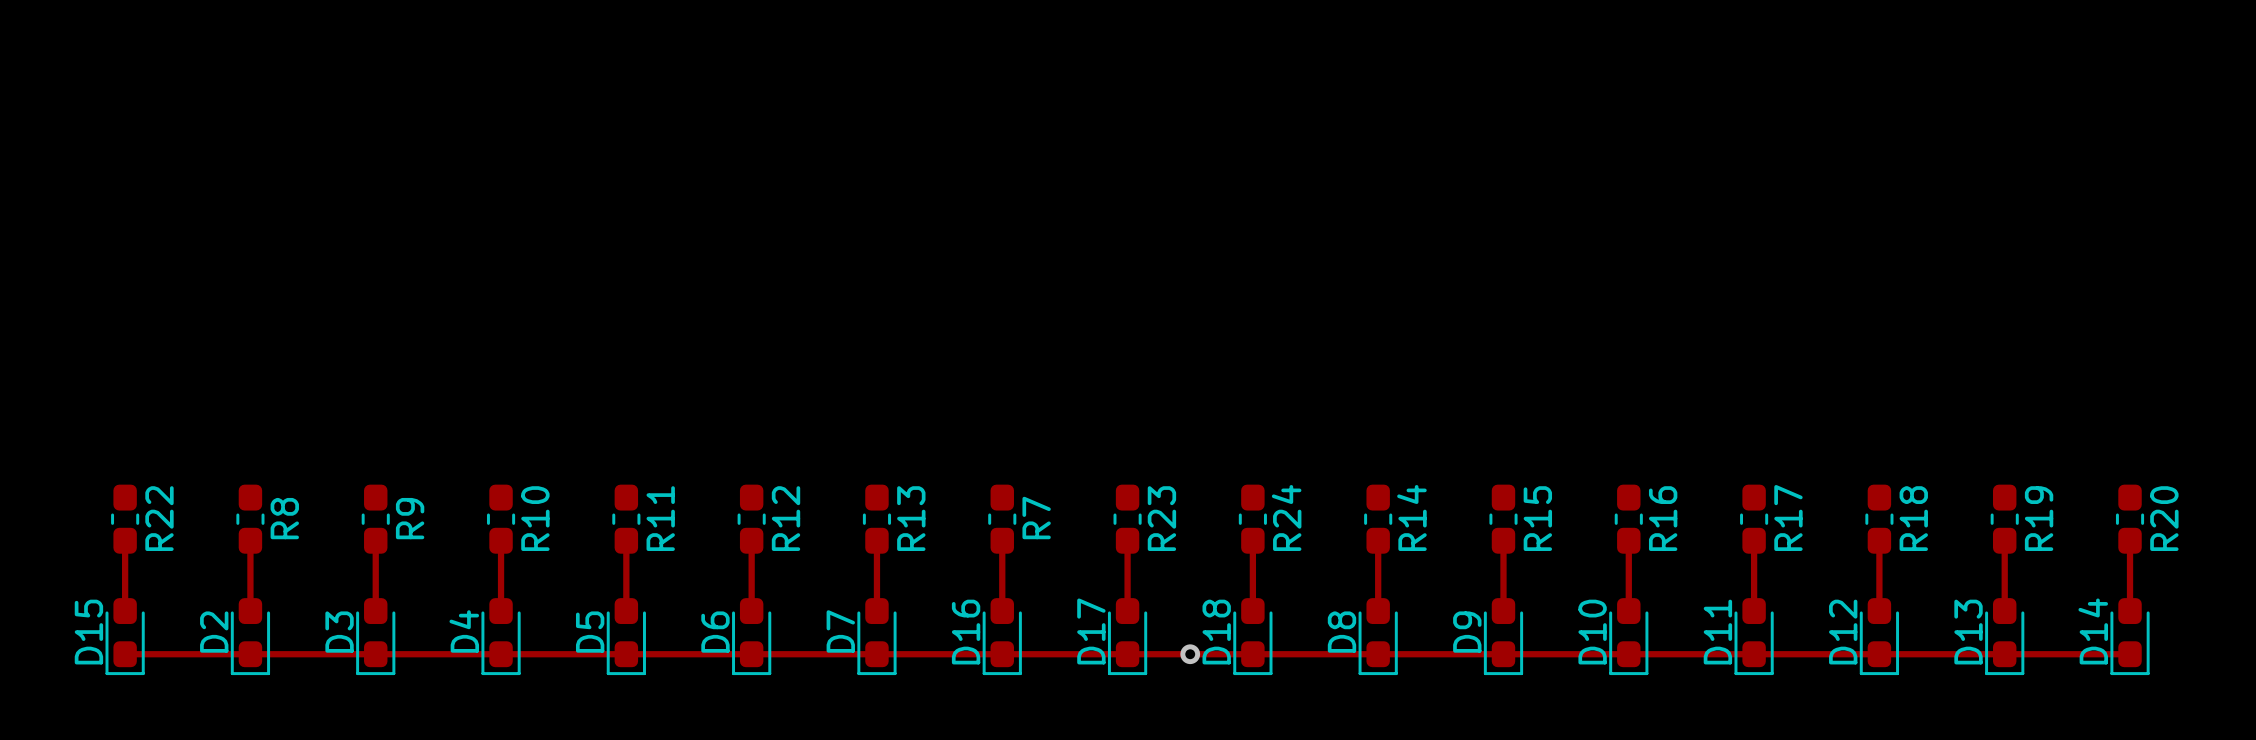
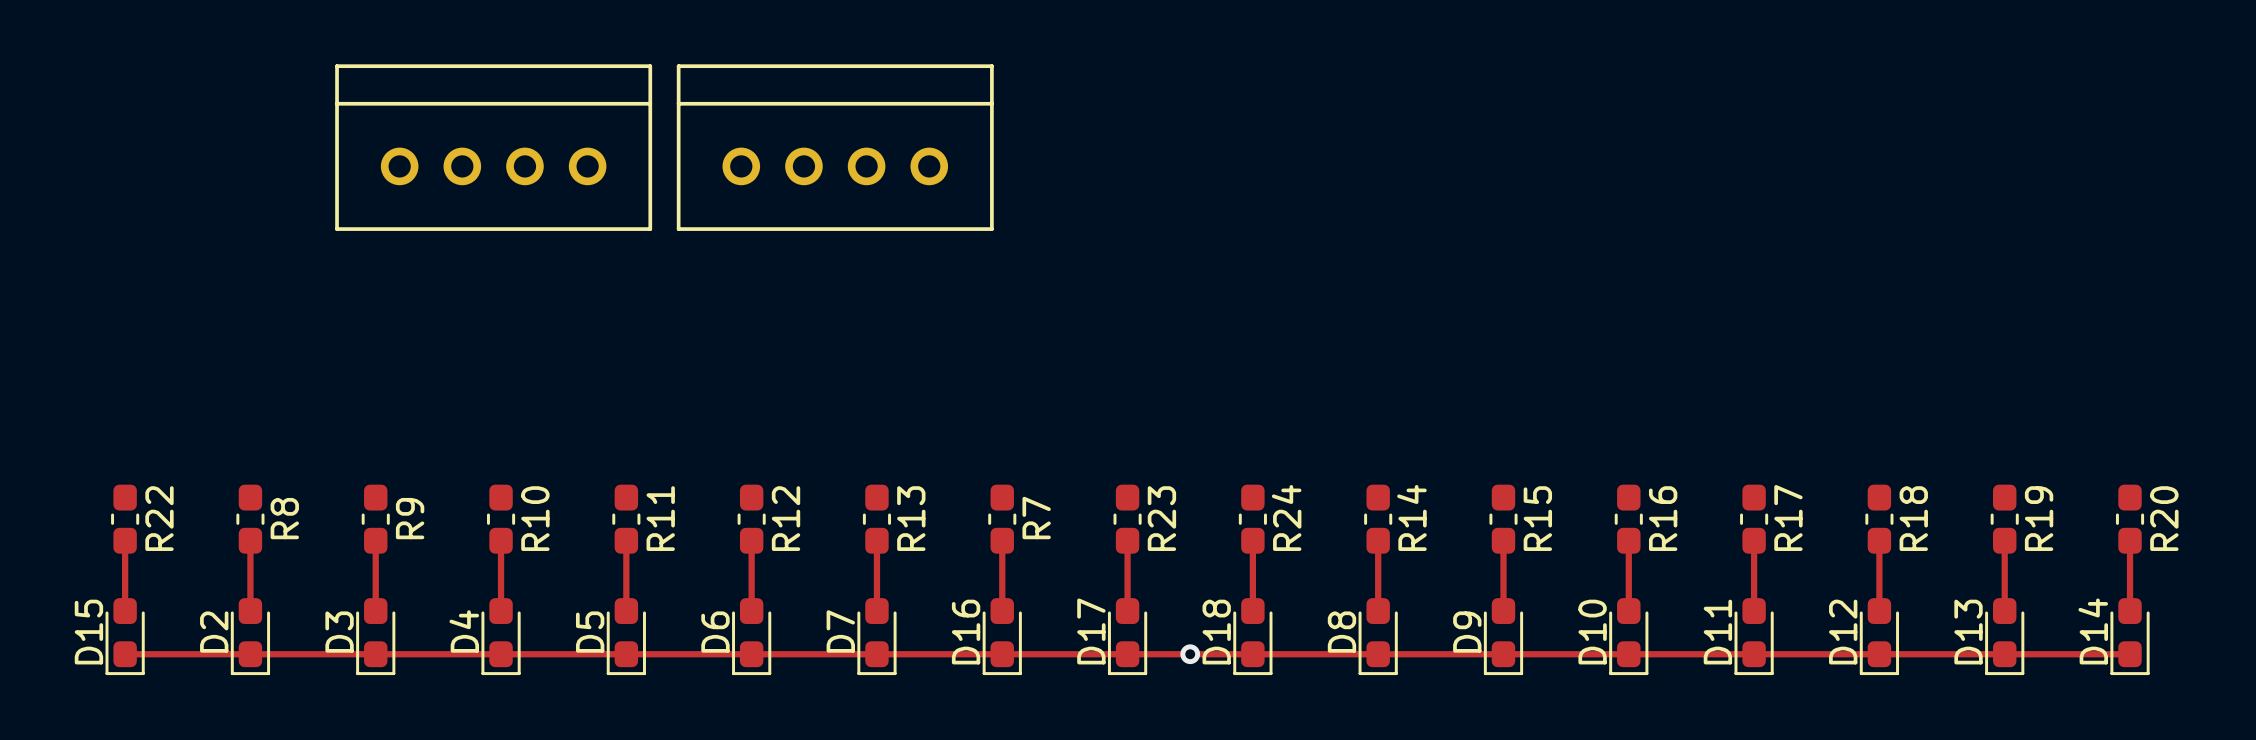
part: none -> (493, 147)
part: none -> (835, 147)

